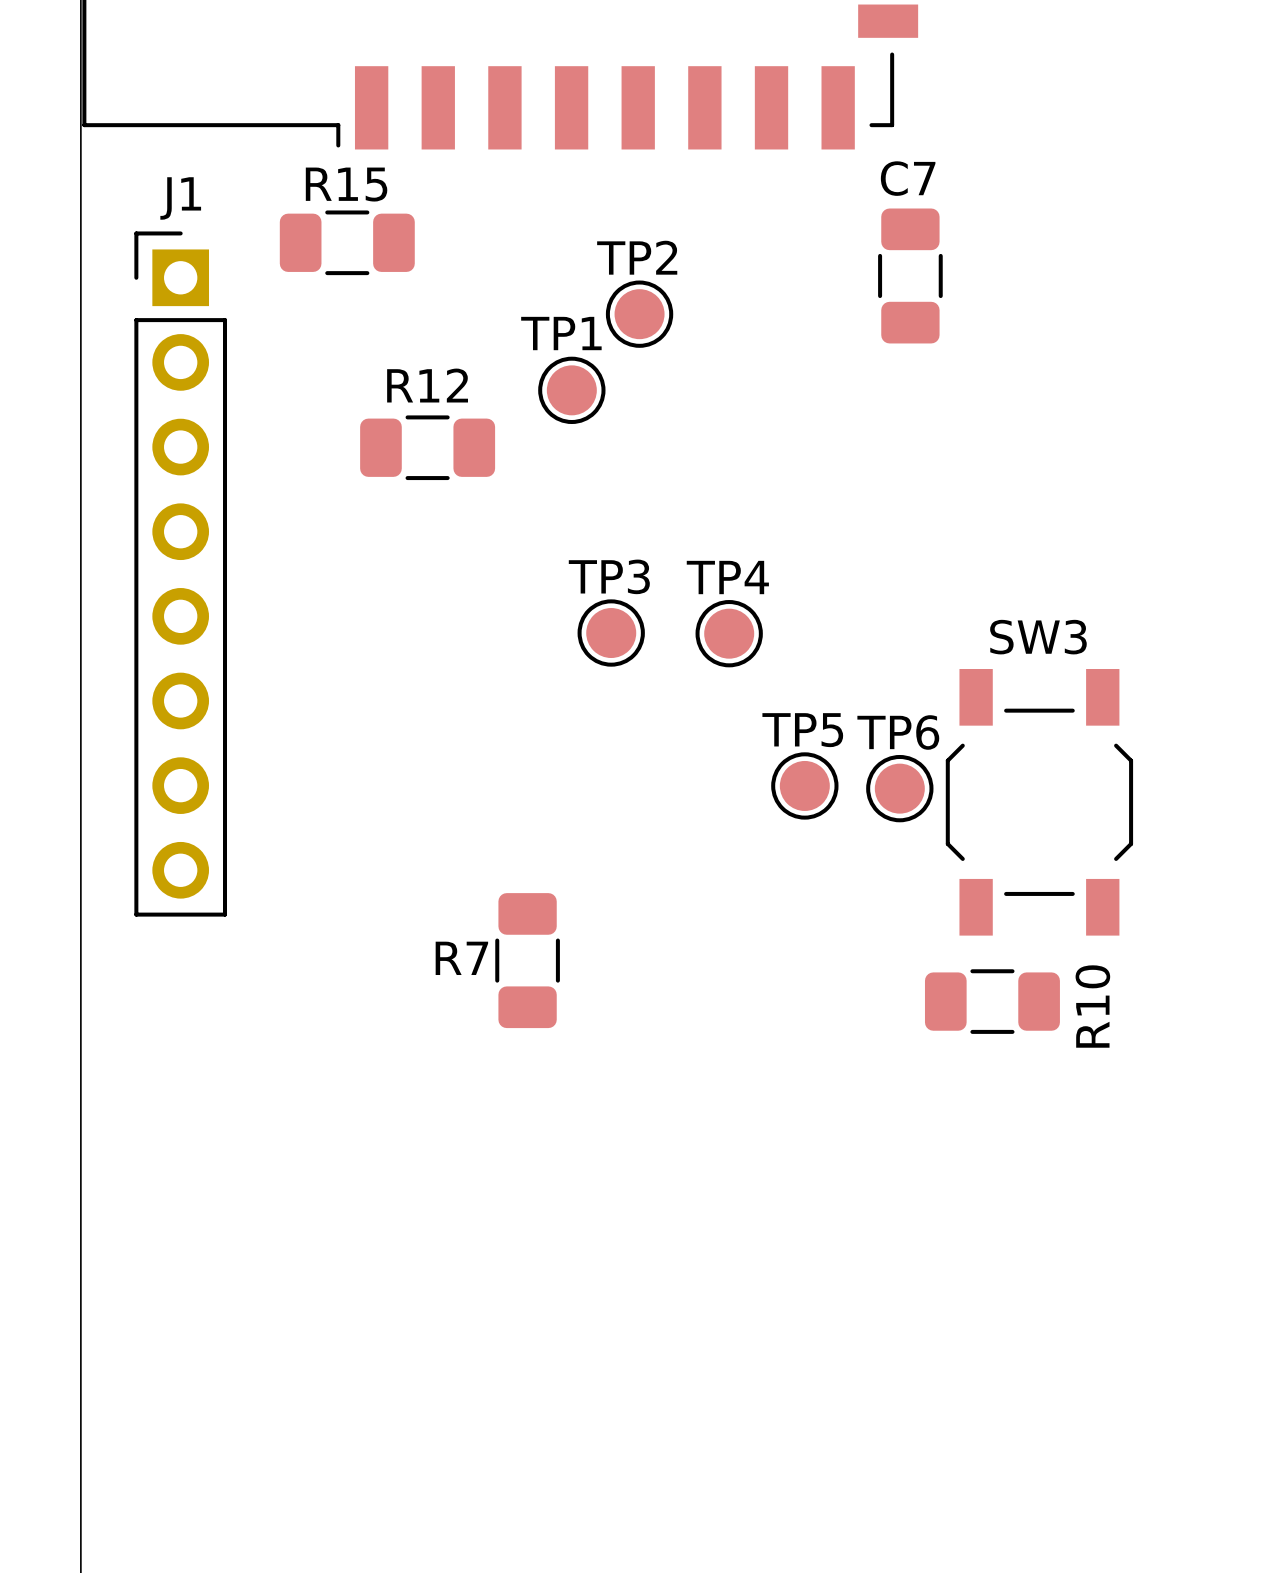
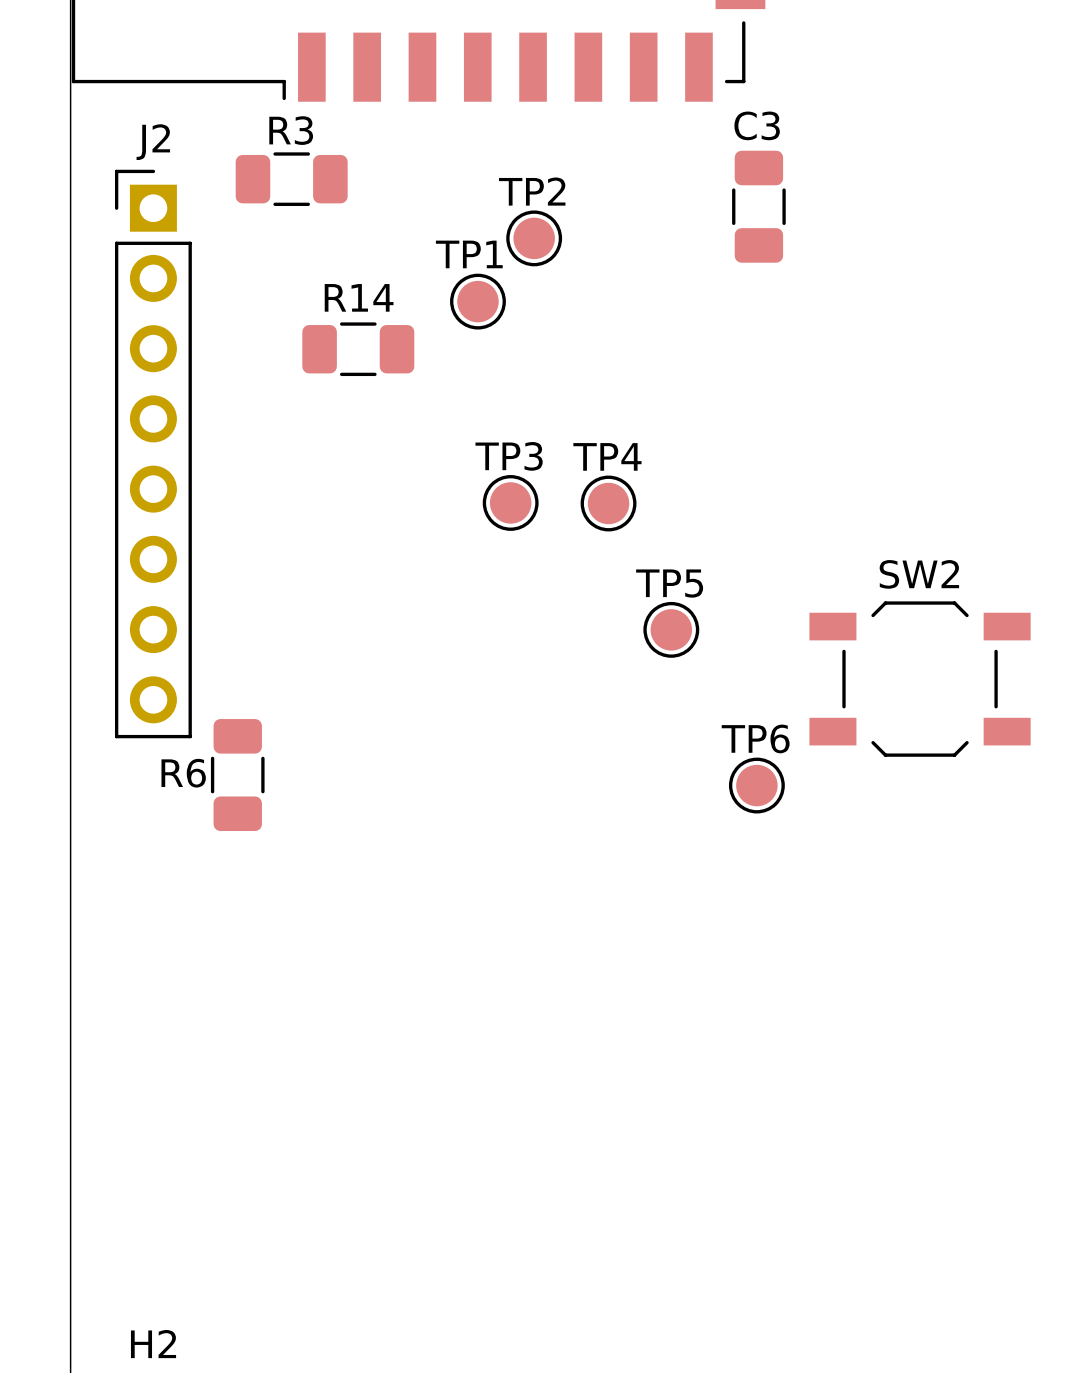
C7 name: C7 (908, 178) -> C3 (757, 125)
R15 name: R15 (346, 184) -> R3 (291, 130)
J1 name: J1 (180, 198) -> J2 (153, 142)
R12 name: R12 (427, 385) -> R14 (359, 297)
TP6 position: (899, 788) -> (756, 785)
SW3: (1039, 802) -> none
SW2: none -> (920, 679)
R6: none -> (237, 775)
R7: (527, 960) -> none
R10: (992, 1001) -> none

